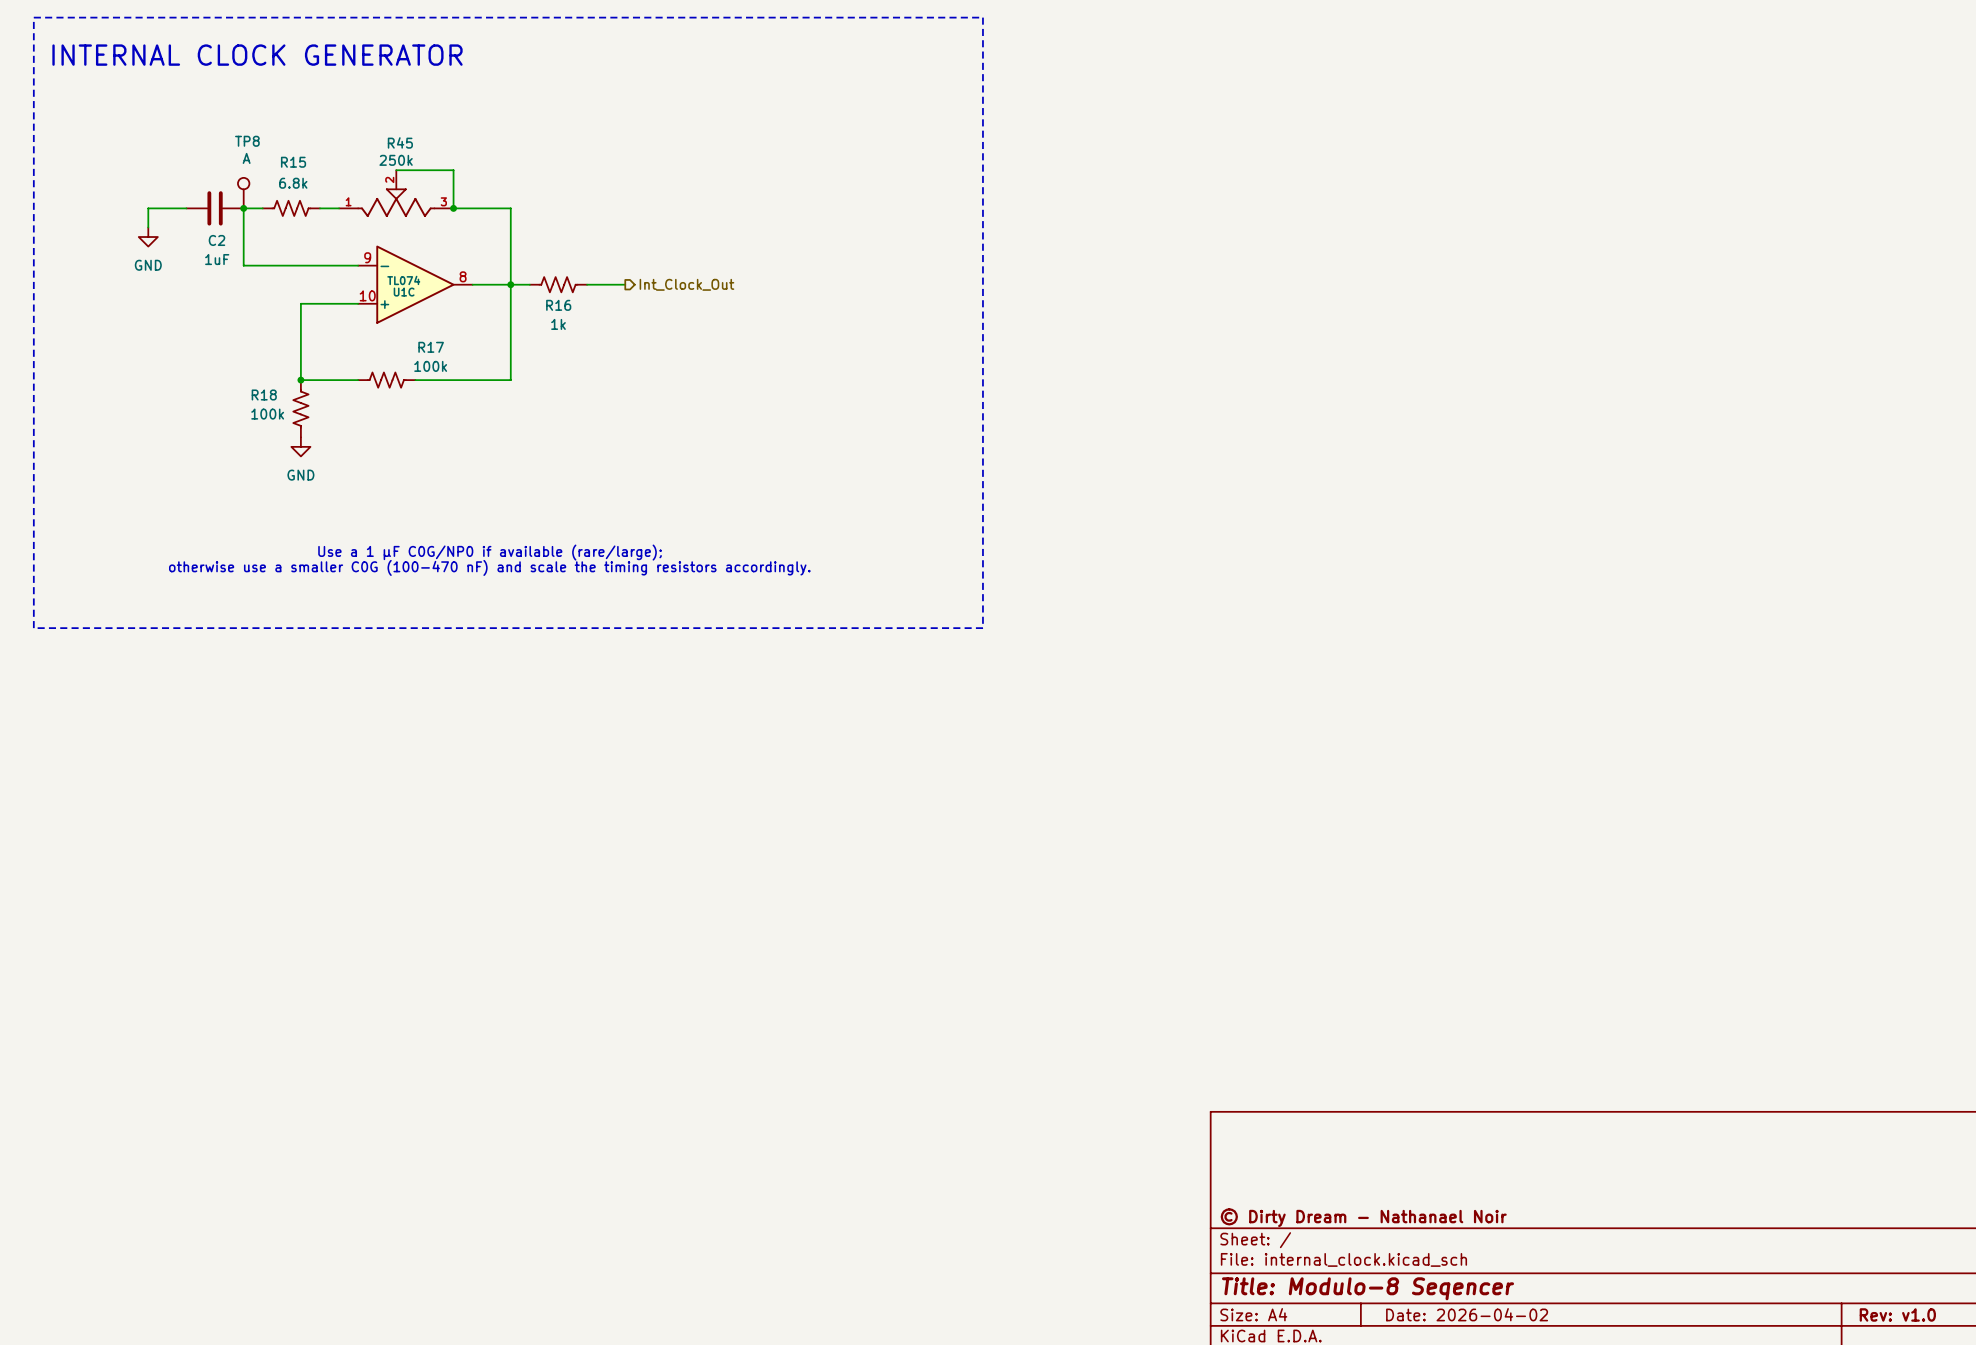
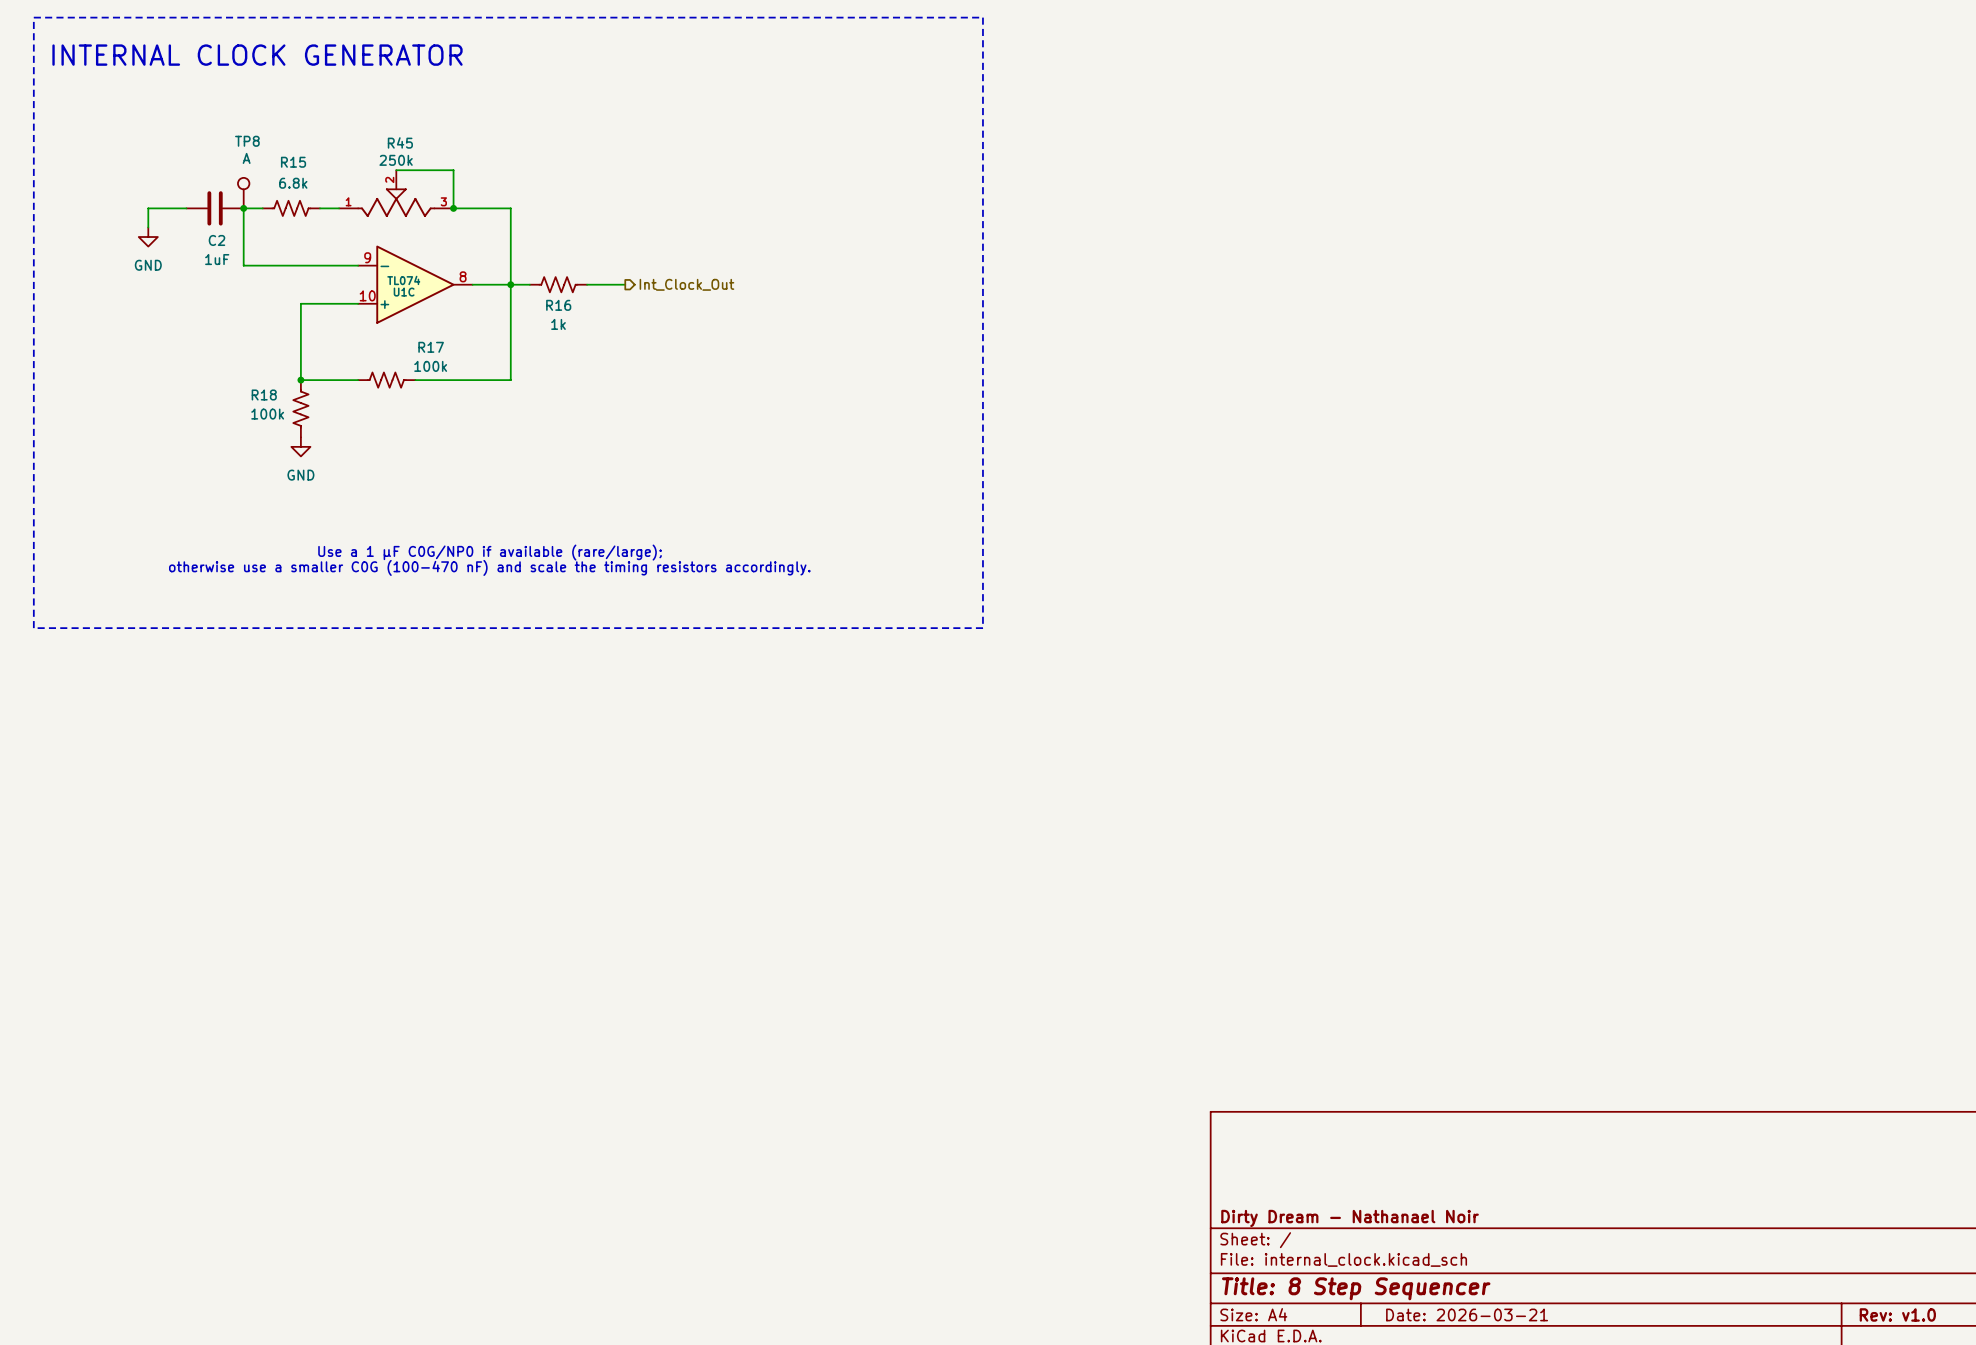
title block: © Dirty Dream - Nathanael Noir (1363, 1217) -> Dirty Dream - Nathanael Noir (1350, 1218)
title block: Title: Modulo-8 Seqencer (1368, 1288) -> Title: 8 Step Sequencer (1356, 1288)
title block: Date: 2026-04-02 (1467, 1314) -> Date: 2026-03-21 (1467, 1314)

